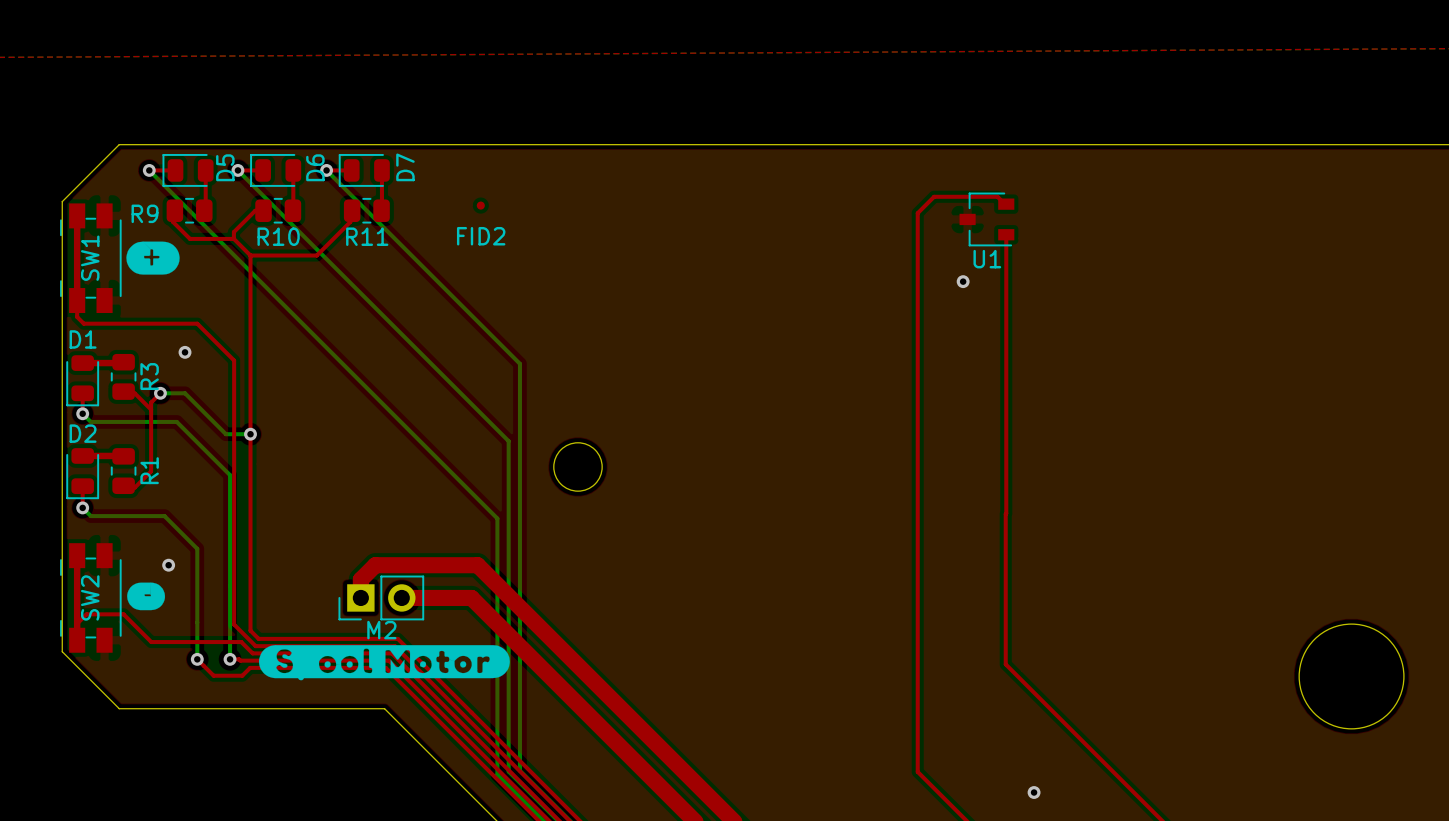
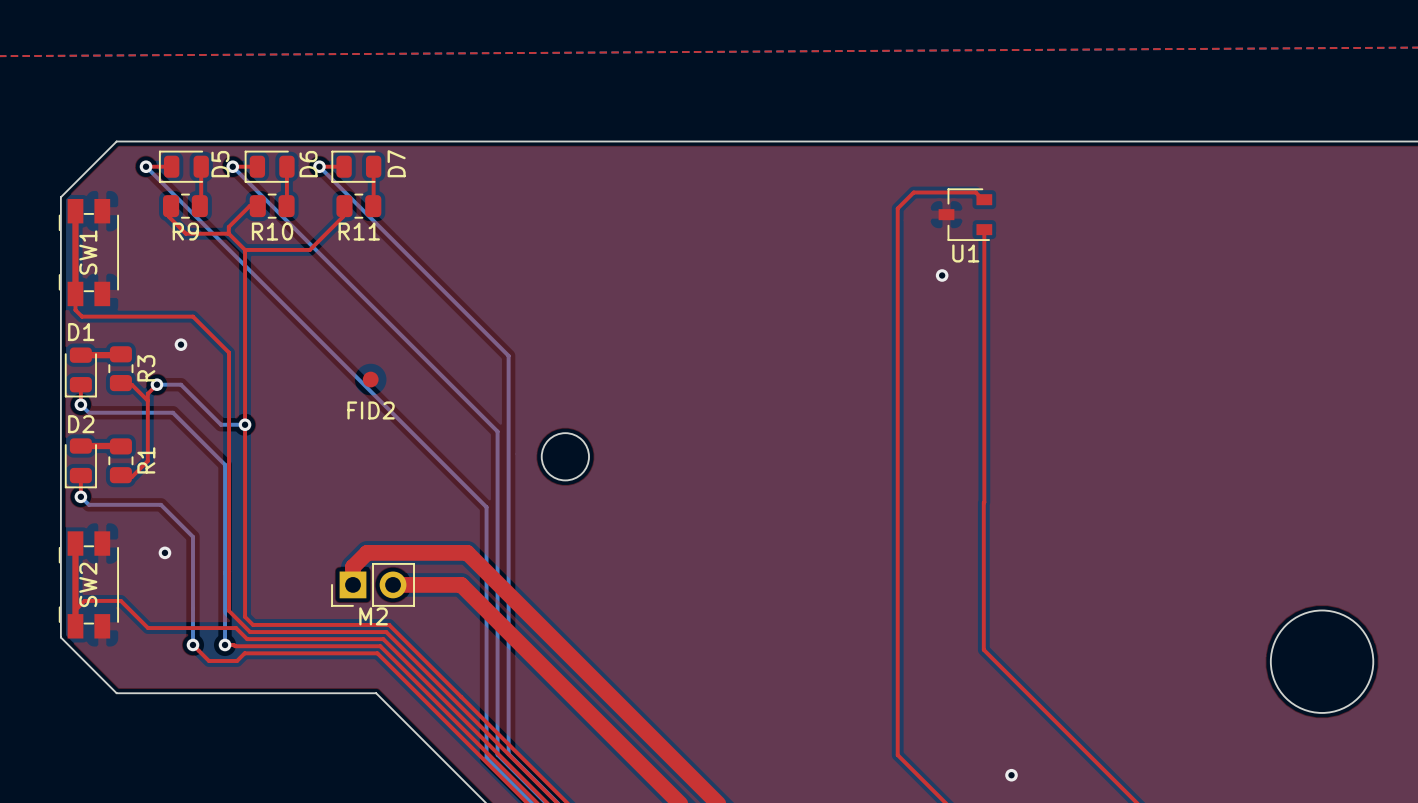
FID2 footprint: [476, 201, 485, 210] -> [362, 371, 379, 388]
R9 name position: R9 (145, 213) -> R9 (185, 231)
drawing: [126, 241, 180, 275] -> none
drawing: [127, 582, 166, 611] -> none
drawing: [258, 645, 510, 681] -> none

